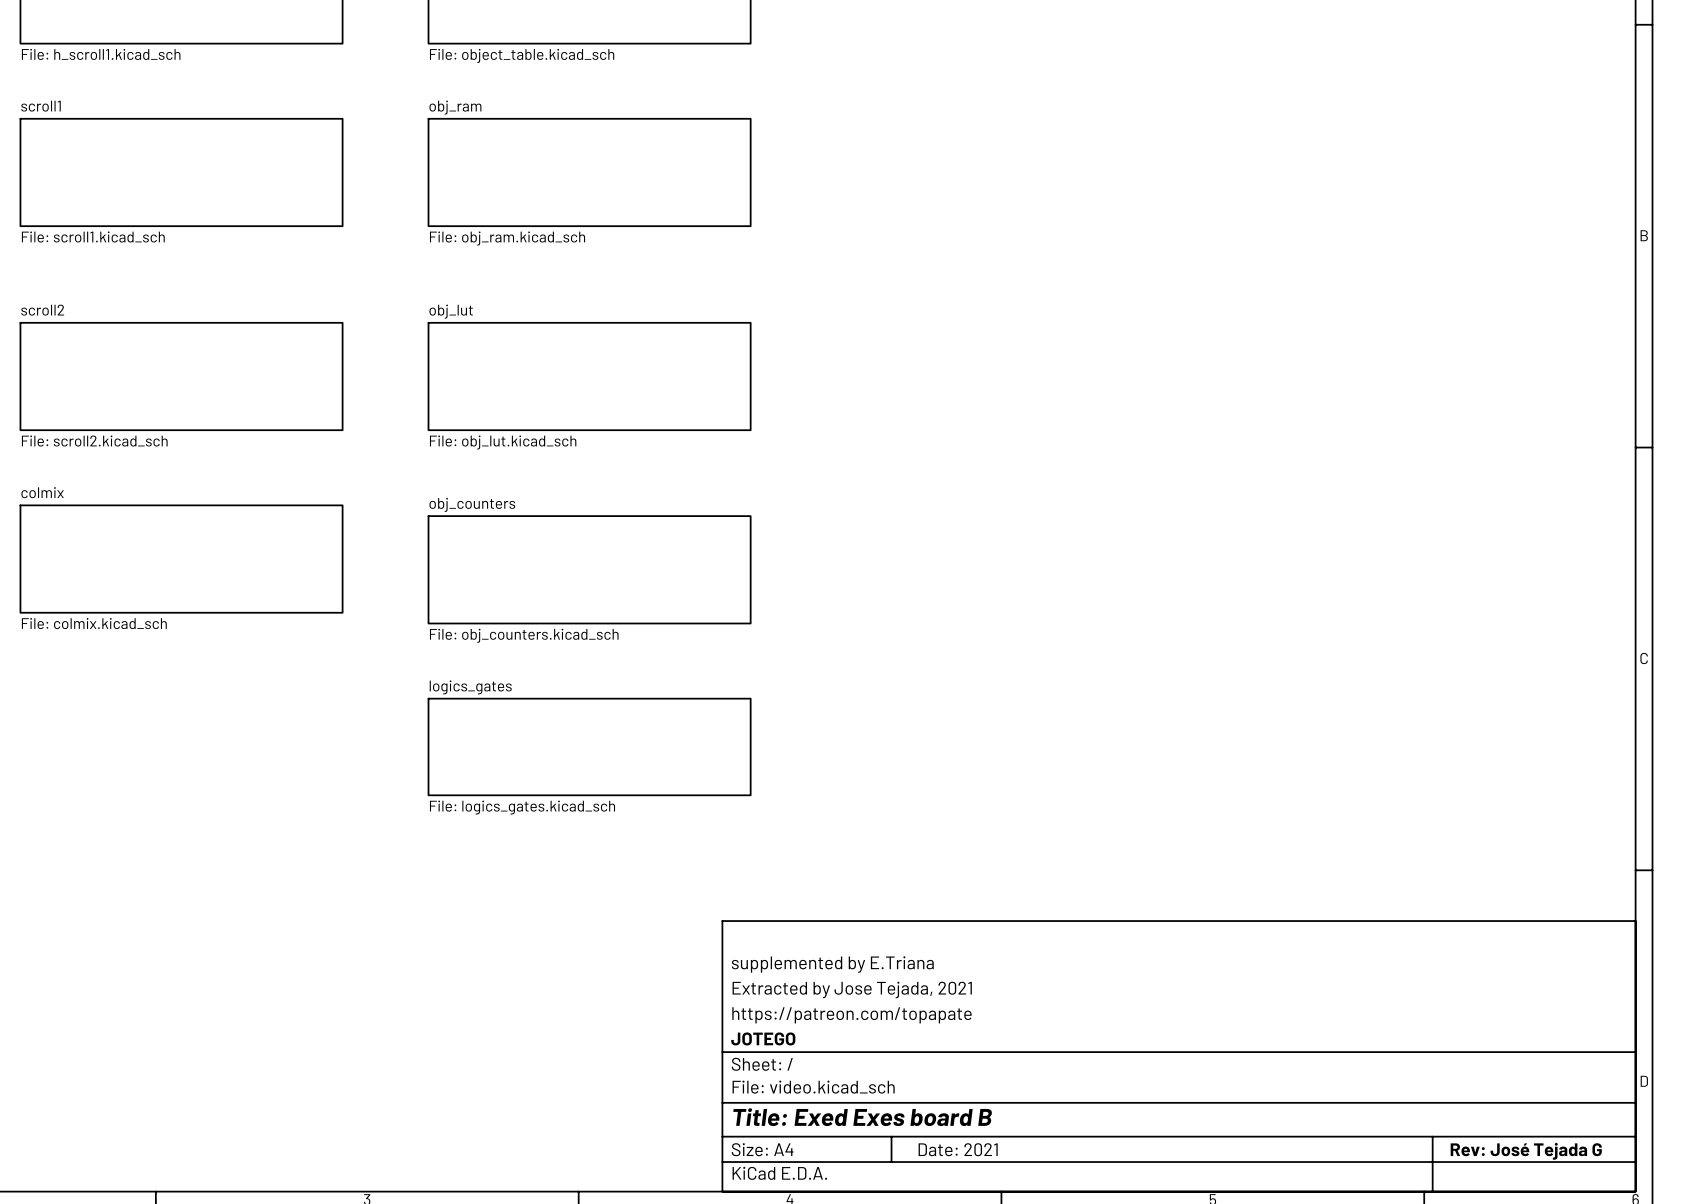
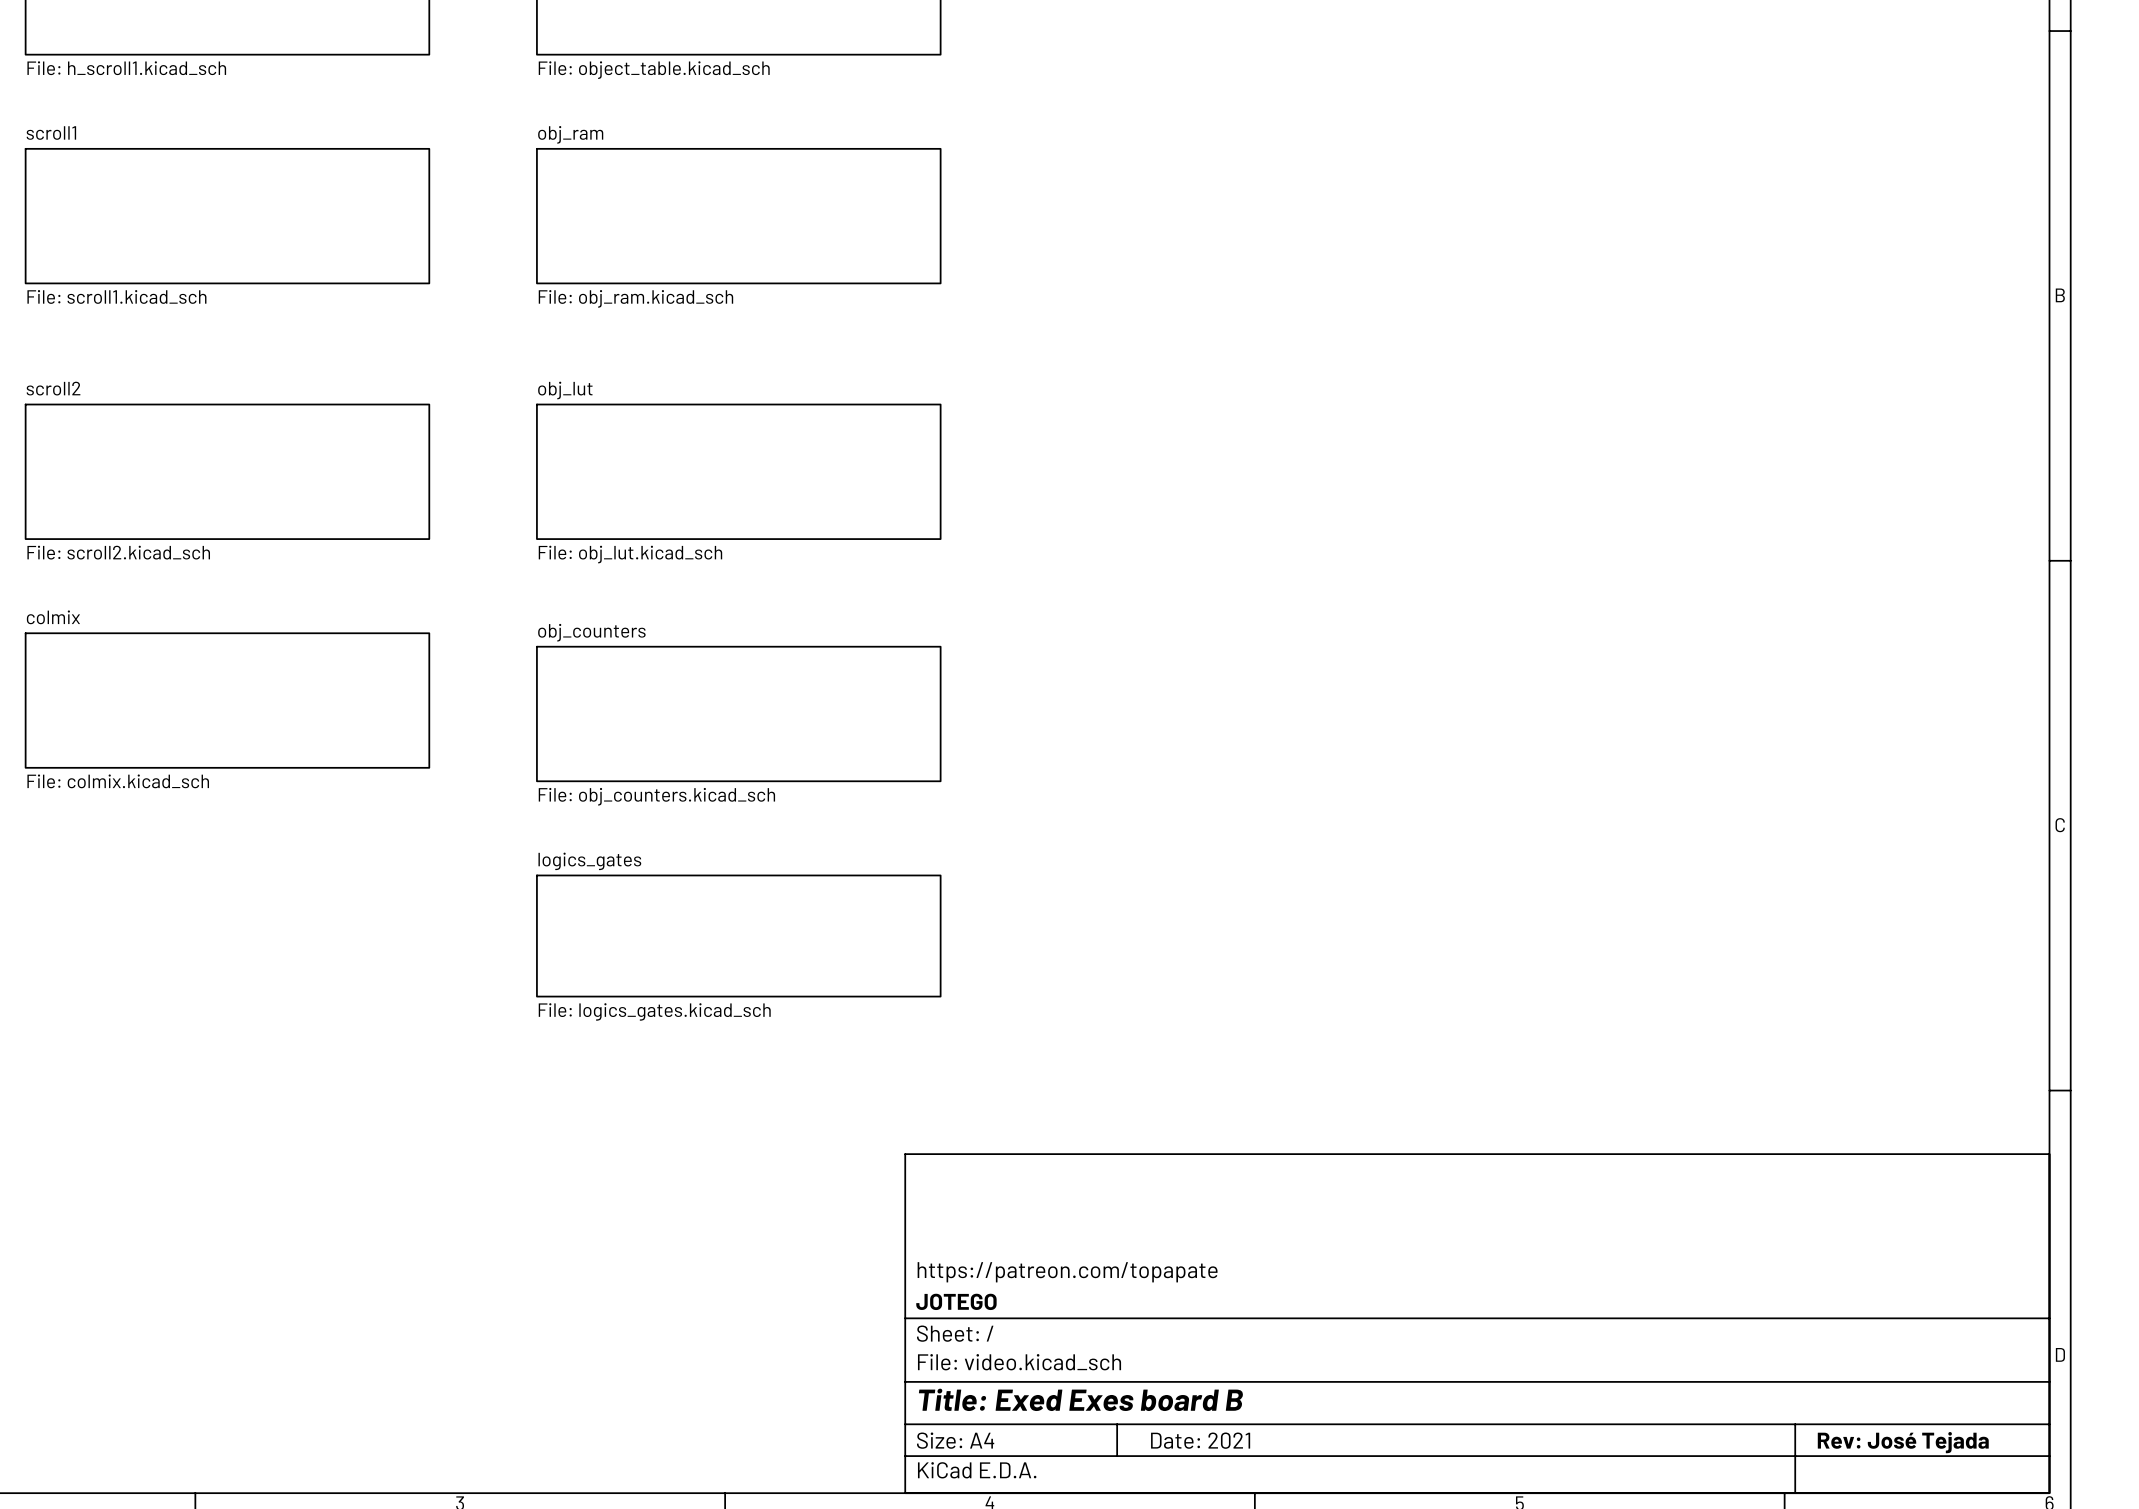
title block: supplemented by E.Triana (832, 964) -> none
title block: Extracted by Jose Tejada, 2021 (852, 990) -> none
title block: Rev: José Tejada G (1526, 1151) -> Rev: José Tejada (1903, 1442)

